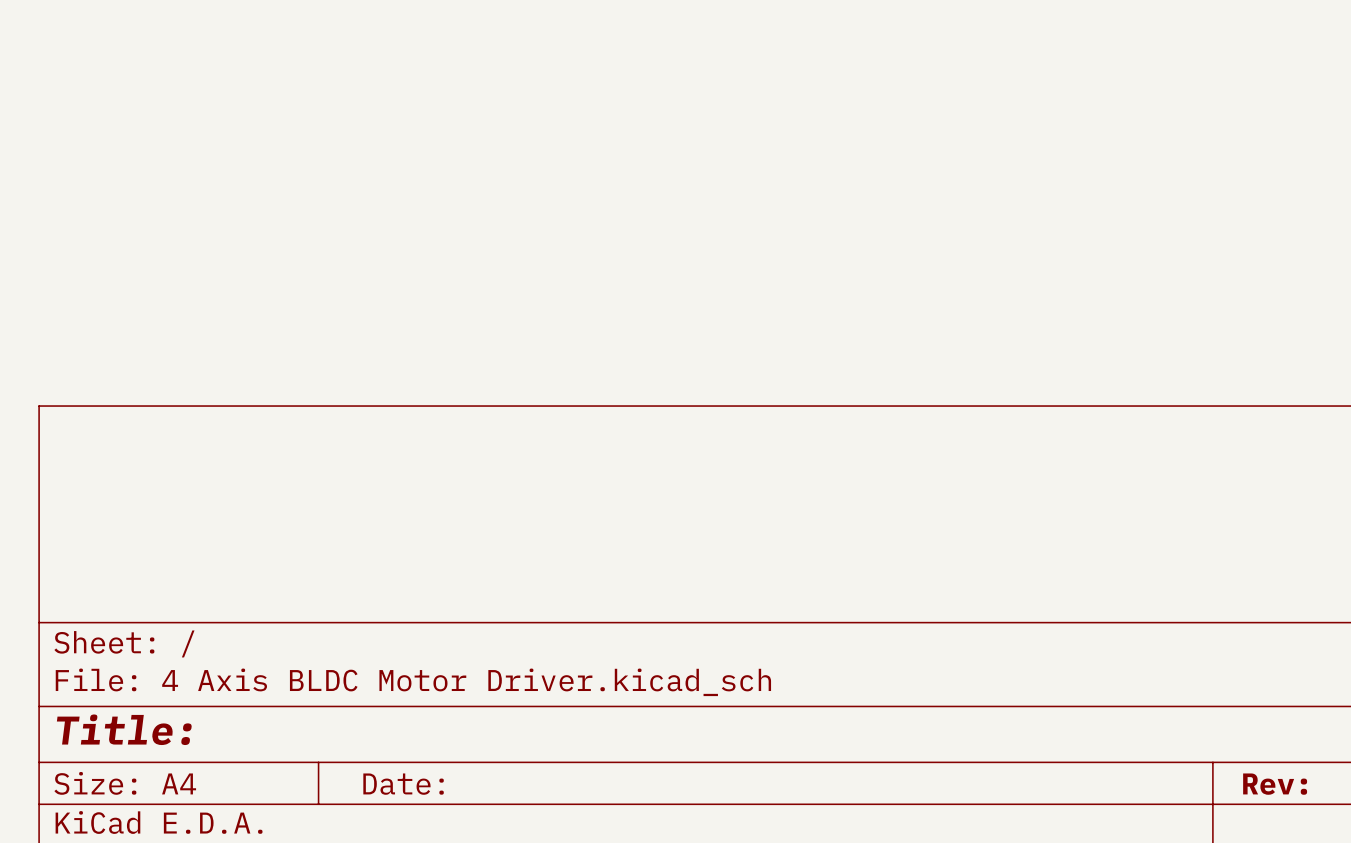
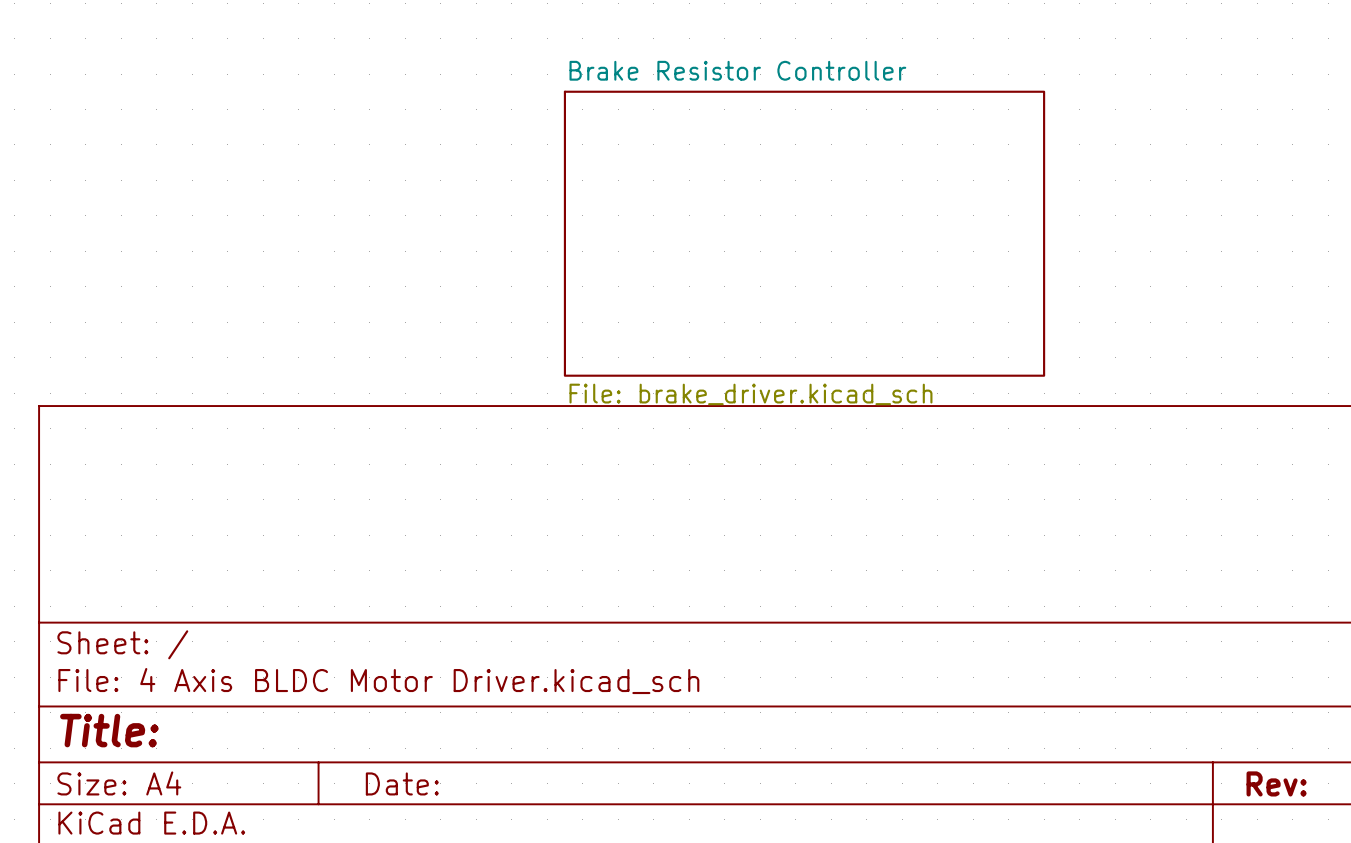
sheet Brake Resistor Controller: none -> File: brake_driver.kicad_sch (804, 233)

